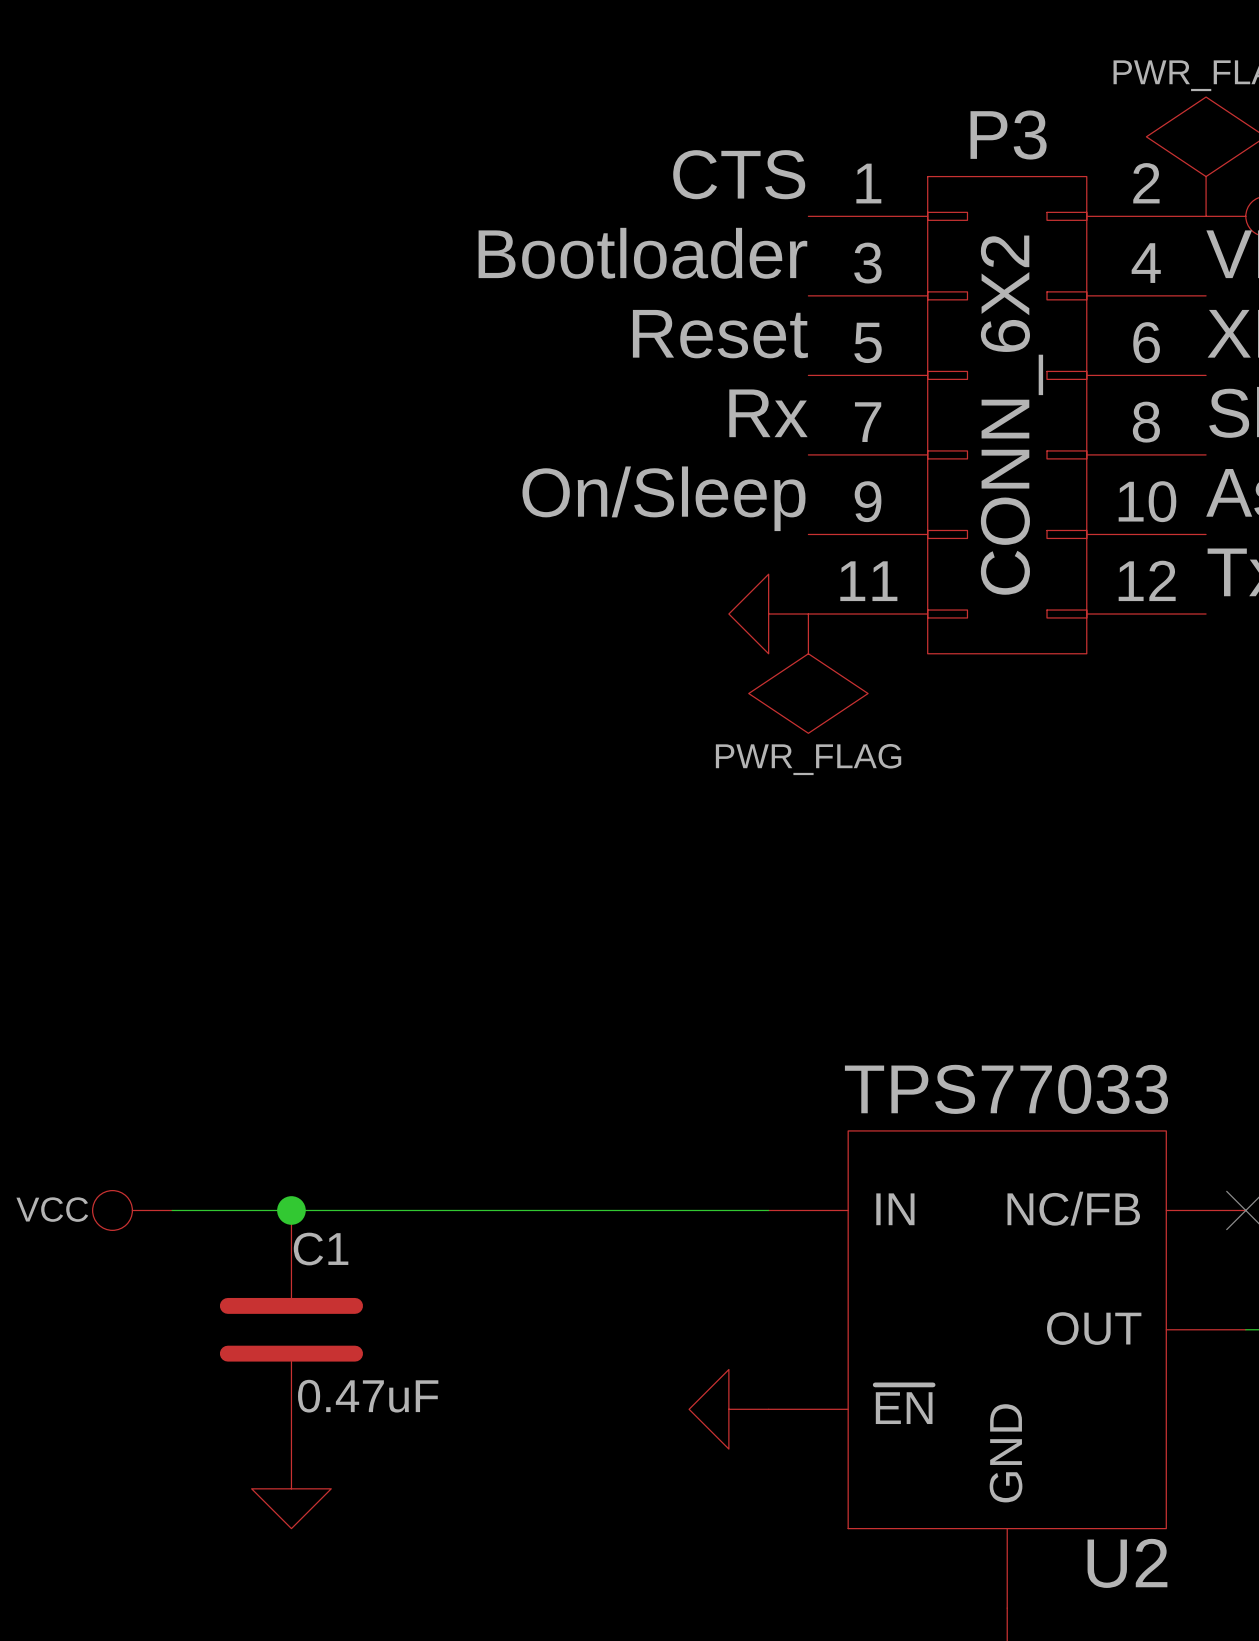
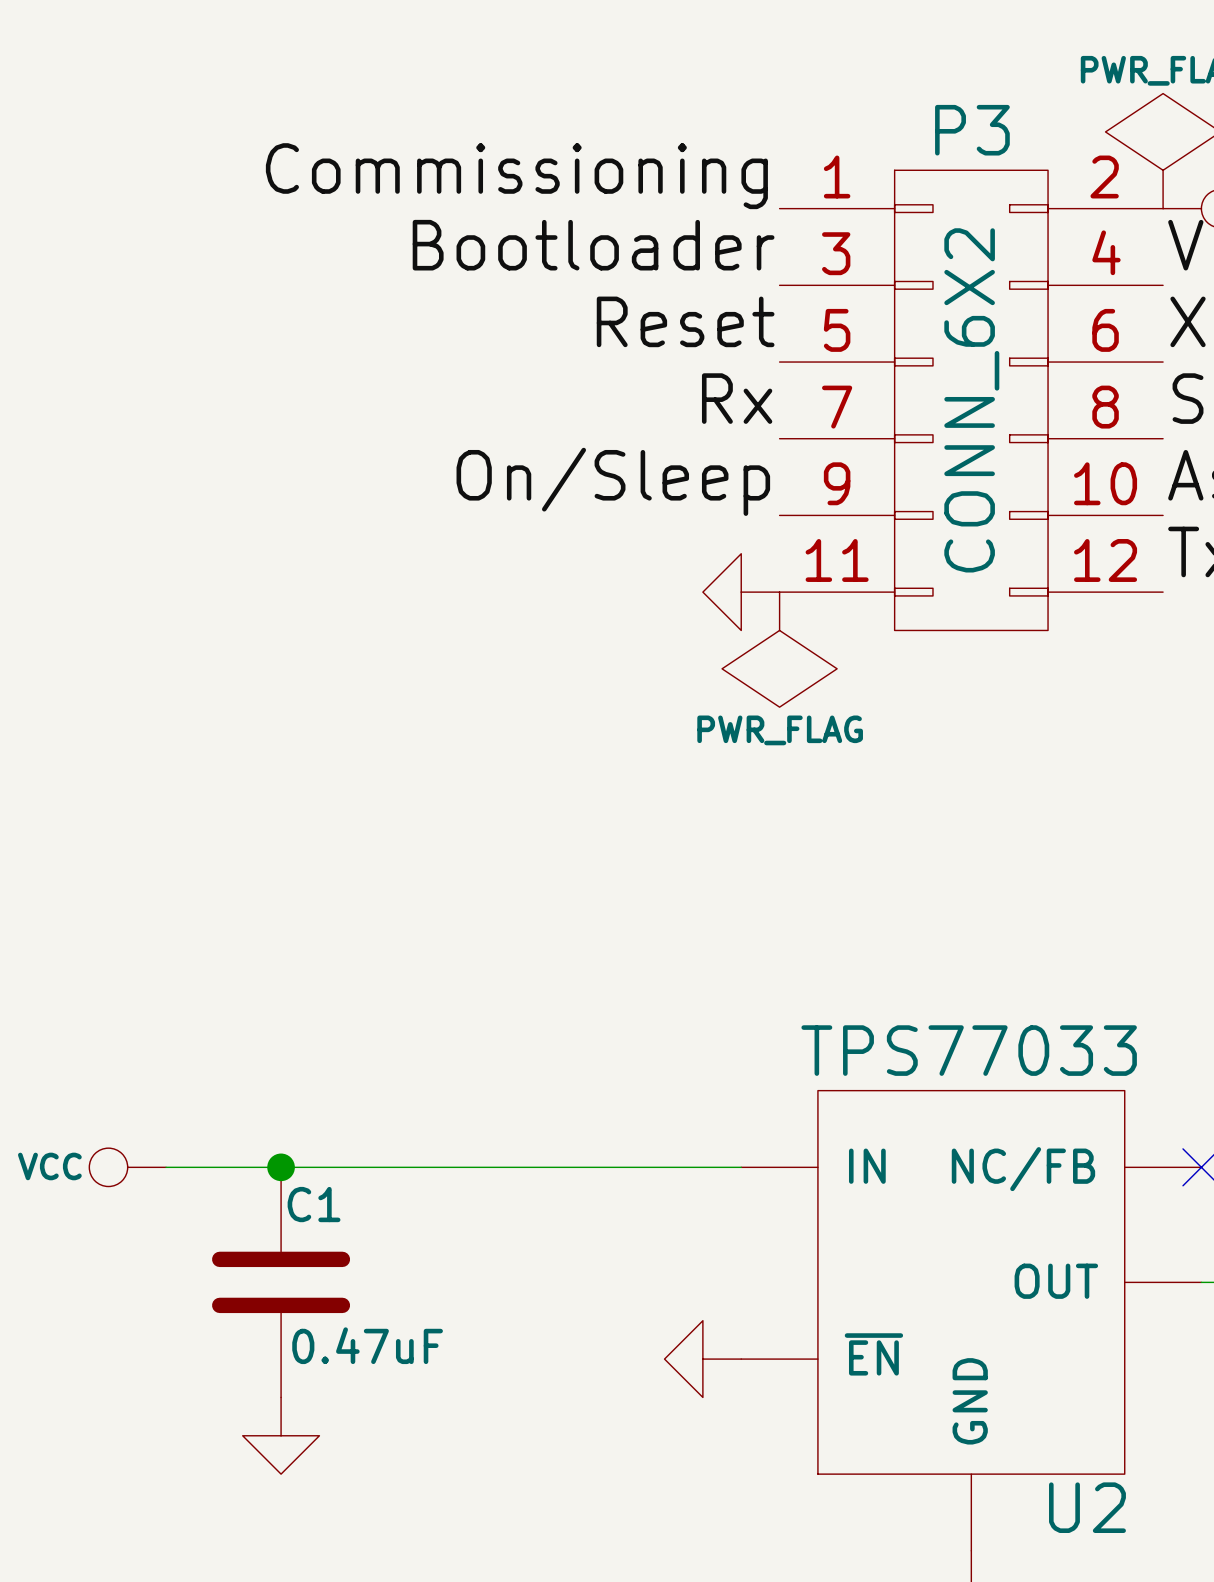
label: CTS (739, 174) -> Commissioning (516, 176)

